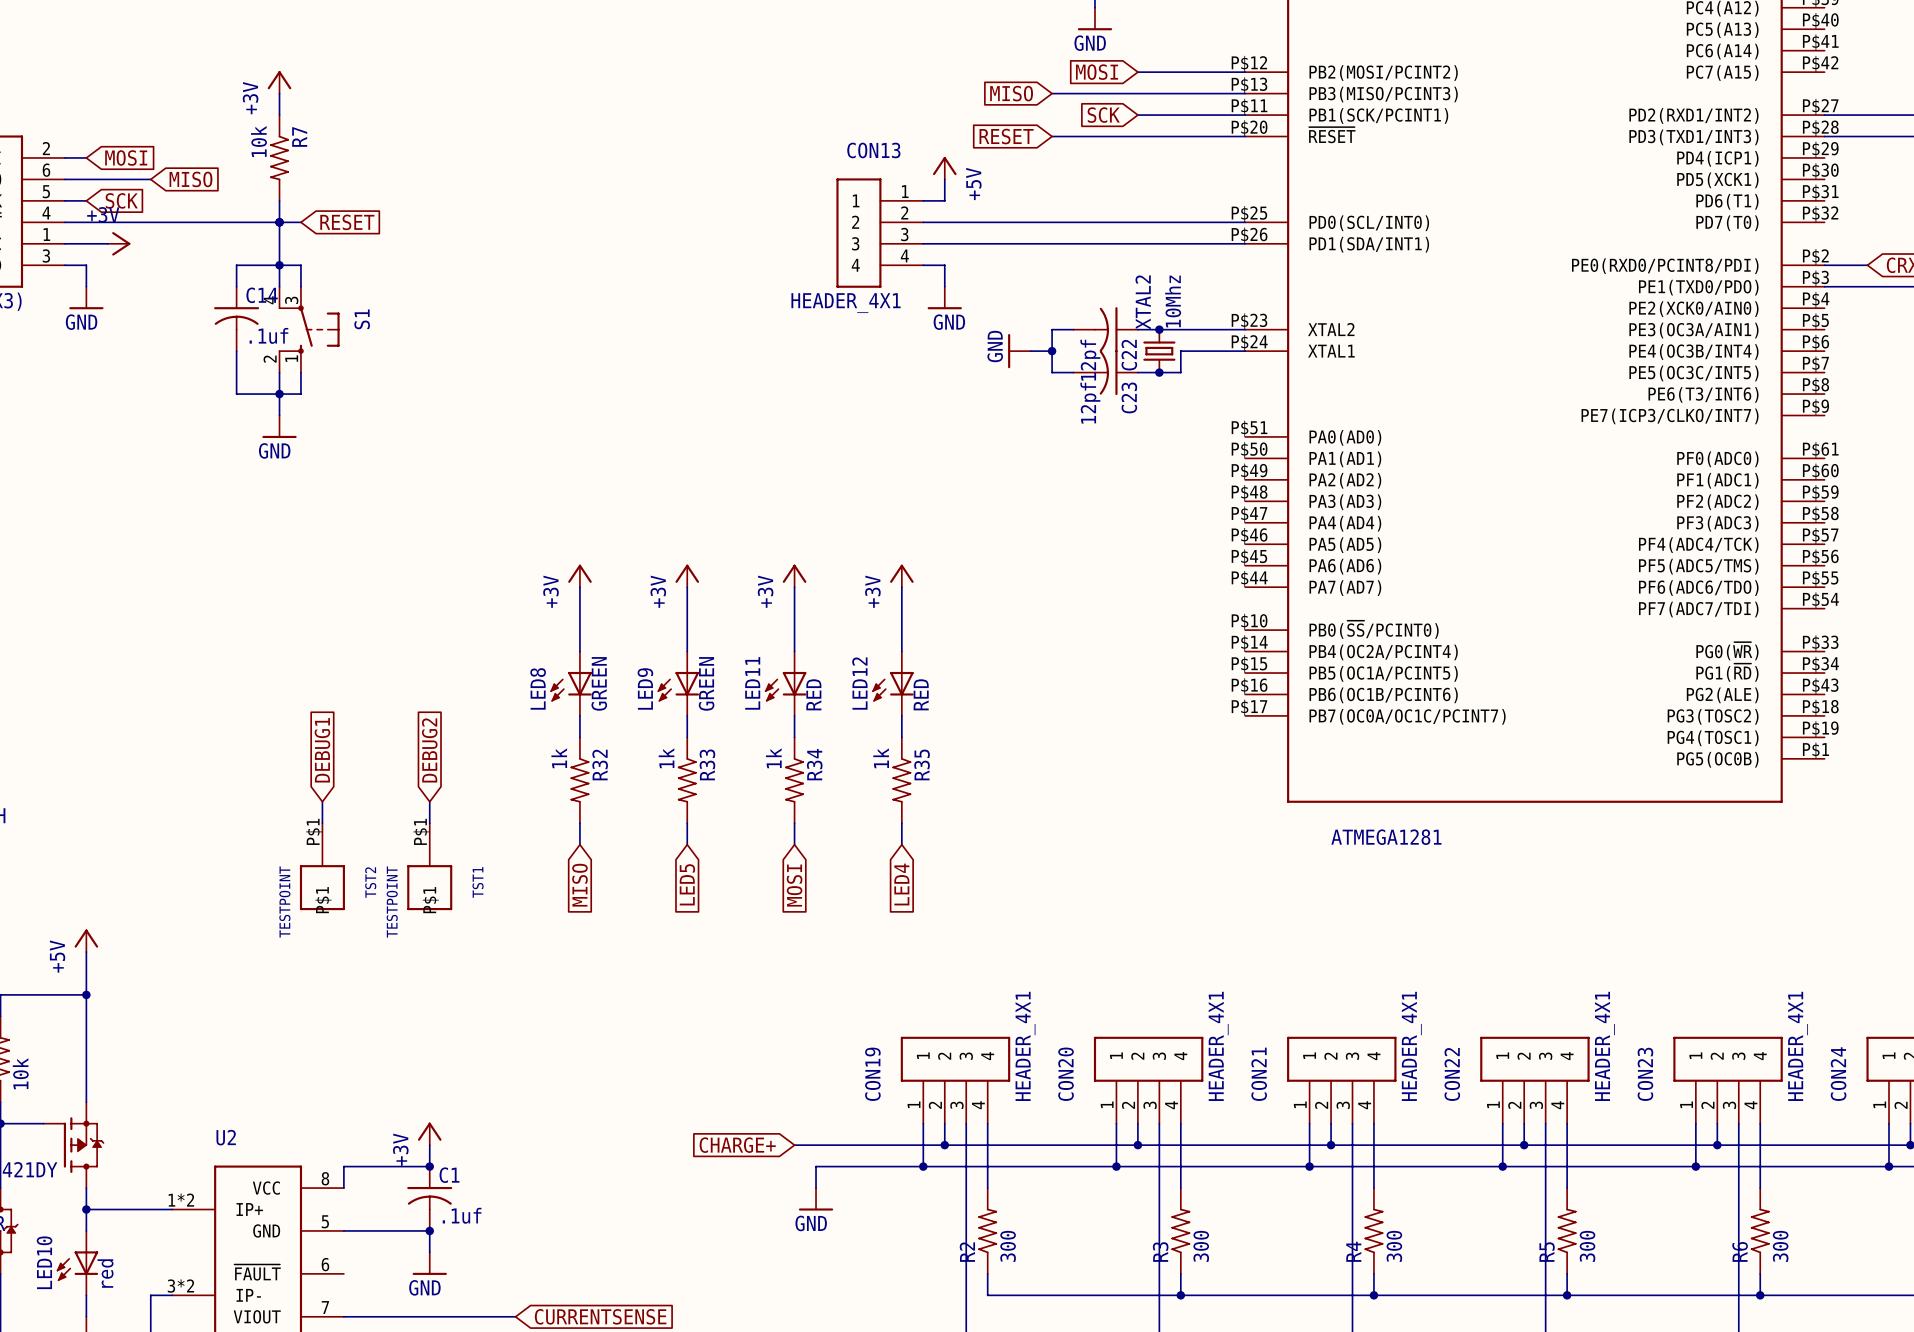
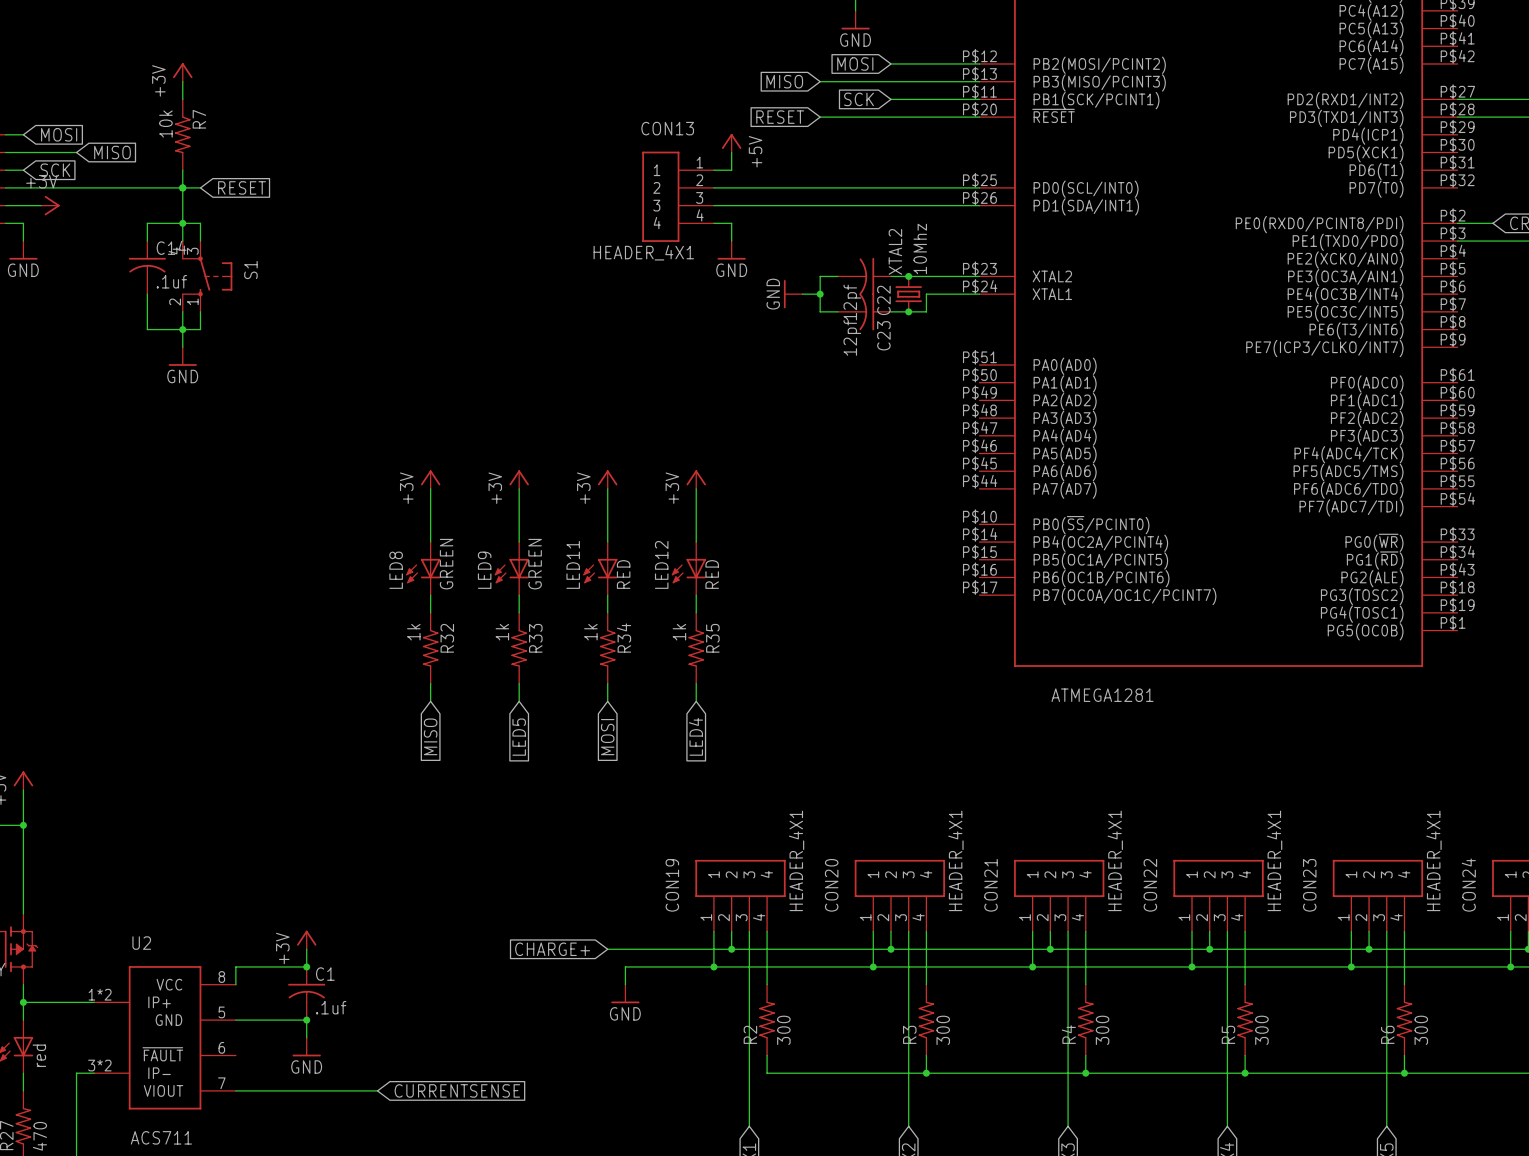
global label: DEBUG1 (322, 750) -> none
global label: DEBUG2 (429, 750) -> none
wire: (322, 801) (322, 823) -> none
wire: (429, 801) (429, 823) -> none
TST2: TESTPOINT (322, 866) -> none
TST1: TESTPOINT (429, 866) -> none

